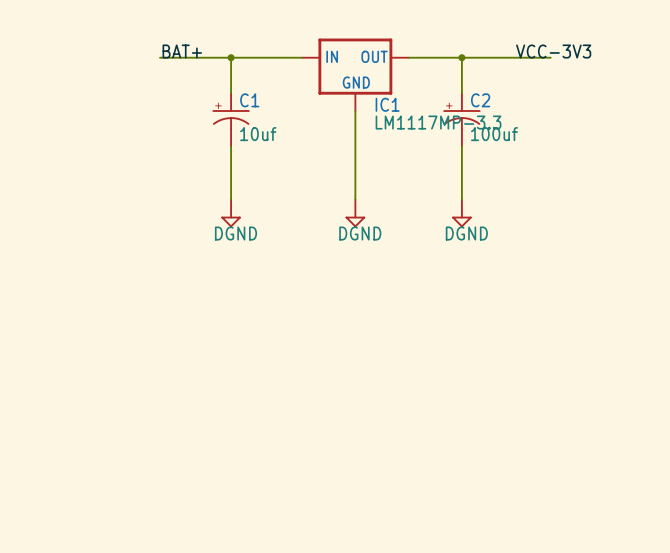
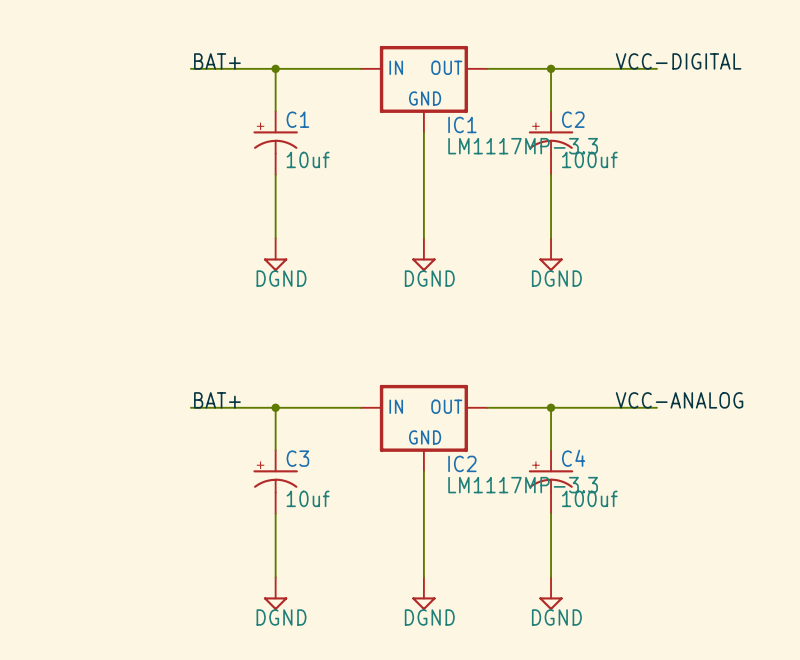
label: VCC-3V3 (553, 51) -> VCC-DIGITAL (678, 61)
label: none -> BAT+ (217, 400)
label: none -> VCC-ANALOG (679, 400)
wire: none -> (190, 407) (360, 407)
wire: none -> (275, 407) (275, 450)
junction: none -> (275, 407)
wire: none -> (487, 407) (656, 407)
wire: none -> (551, 407) (551, 450)
junction: none -> (551, 407)
IC2: none -> LM1117MP-3.3 (423, 428)
wire: none -> (423, 471) (423, 577)
C3: none -> 10uf (275, 481)
C4: none -> 100uf (551, 481)
wire: none -> (275, 513) (275, 577)
wire: none -> (551, 513) (551, 577)
power symbol: none -> DGND (275, 593)
power symbol: none -> DGND (423, 593)
power symbol: none -> DGND (551, 593)

